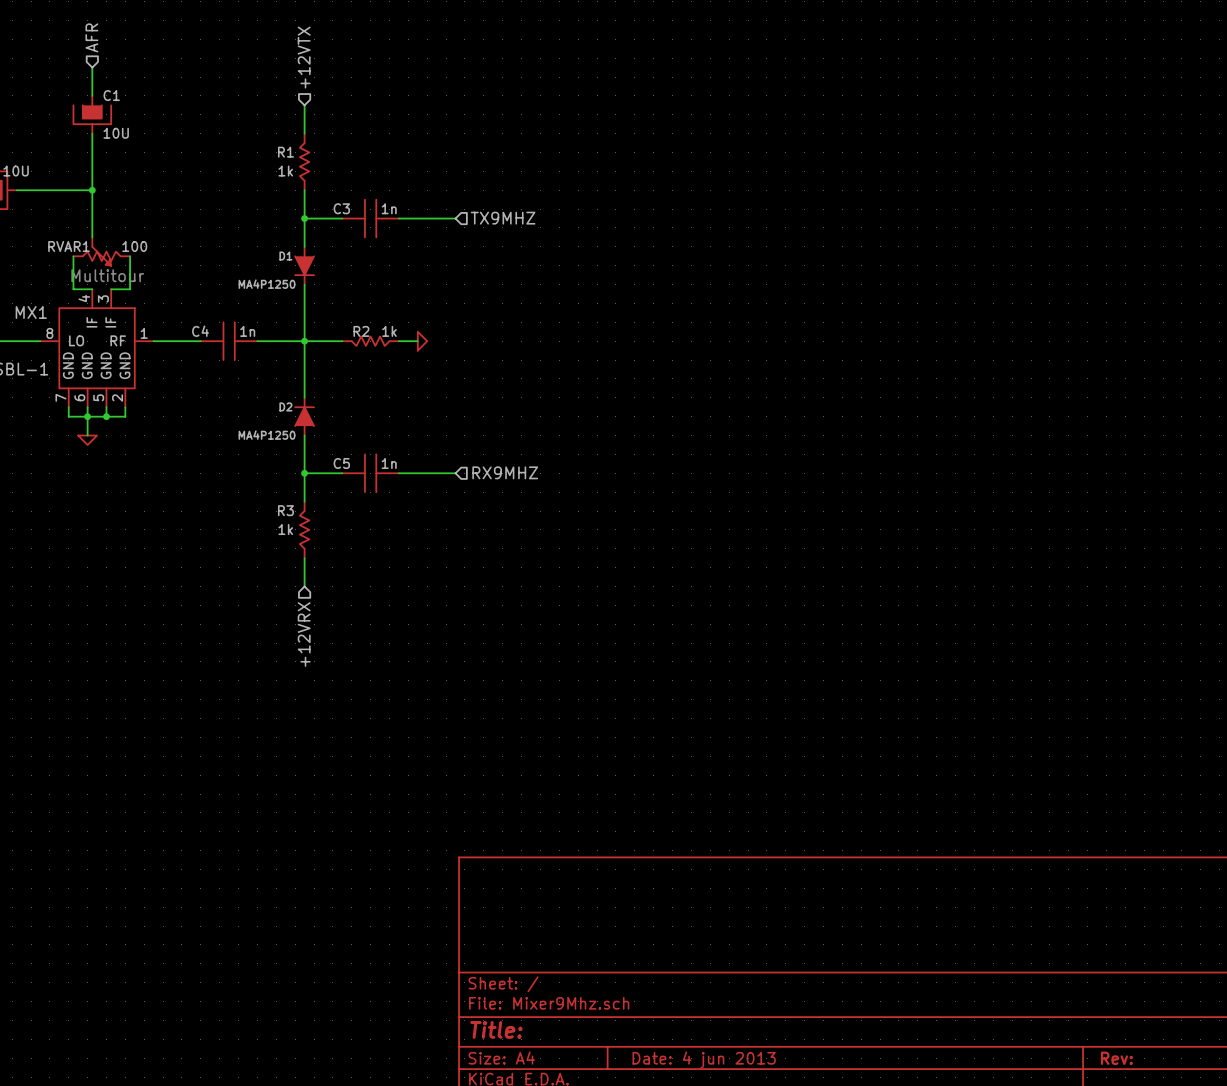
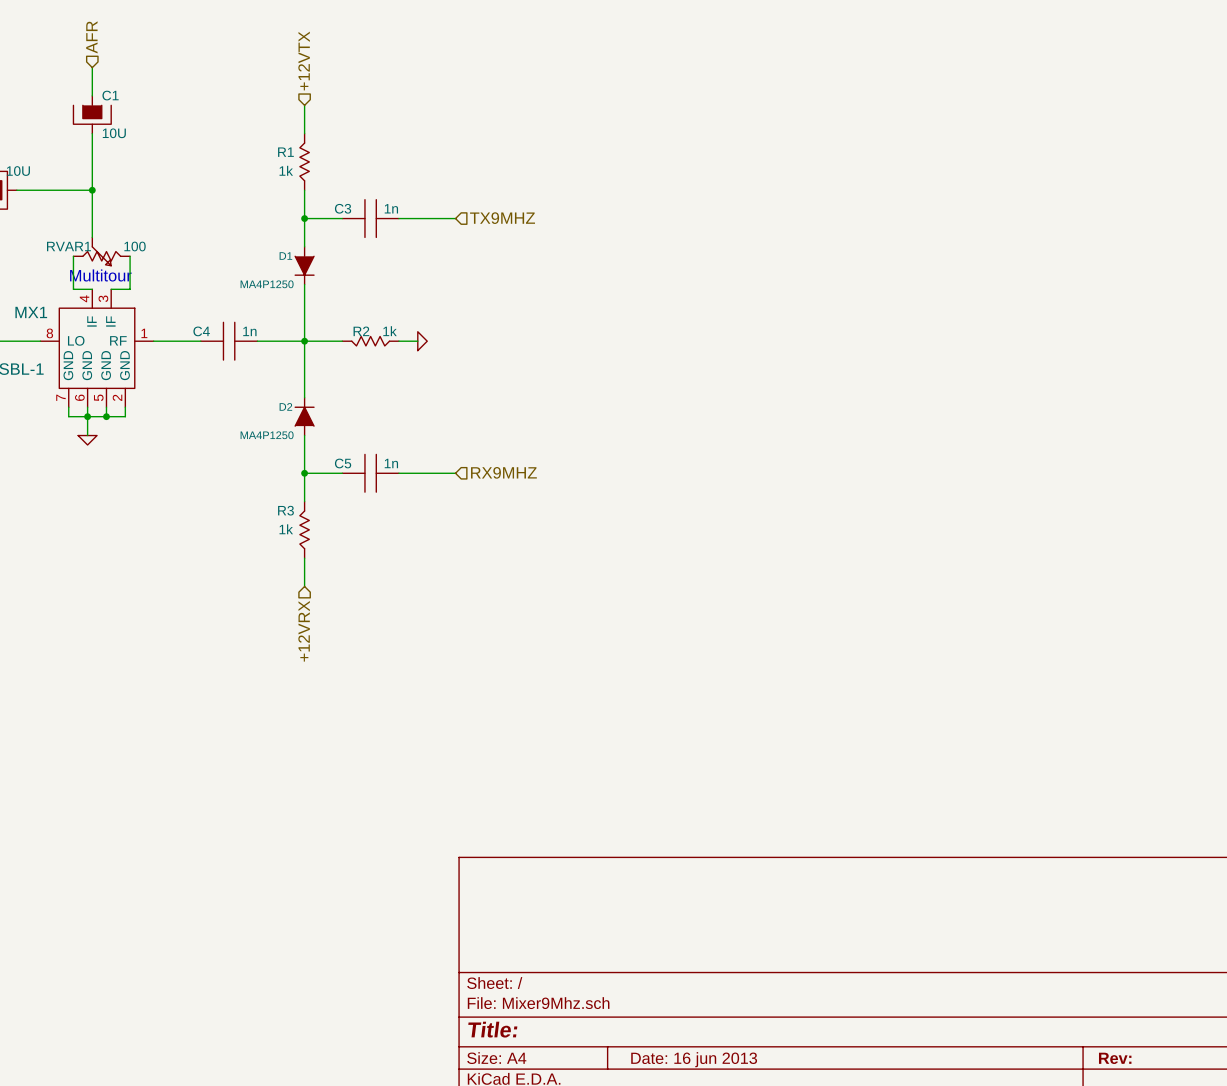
title block: Date: 4 jun 2013 (704, 1059) -> Date: 16 jun 2013 (694, 1059)

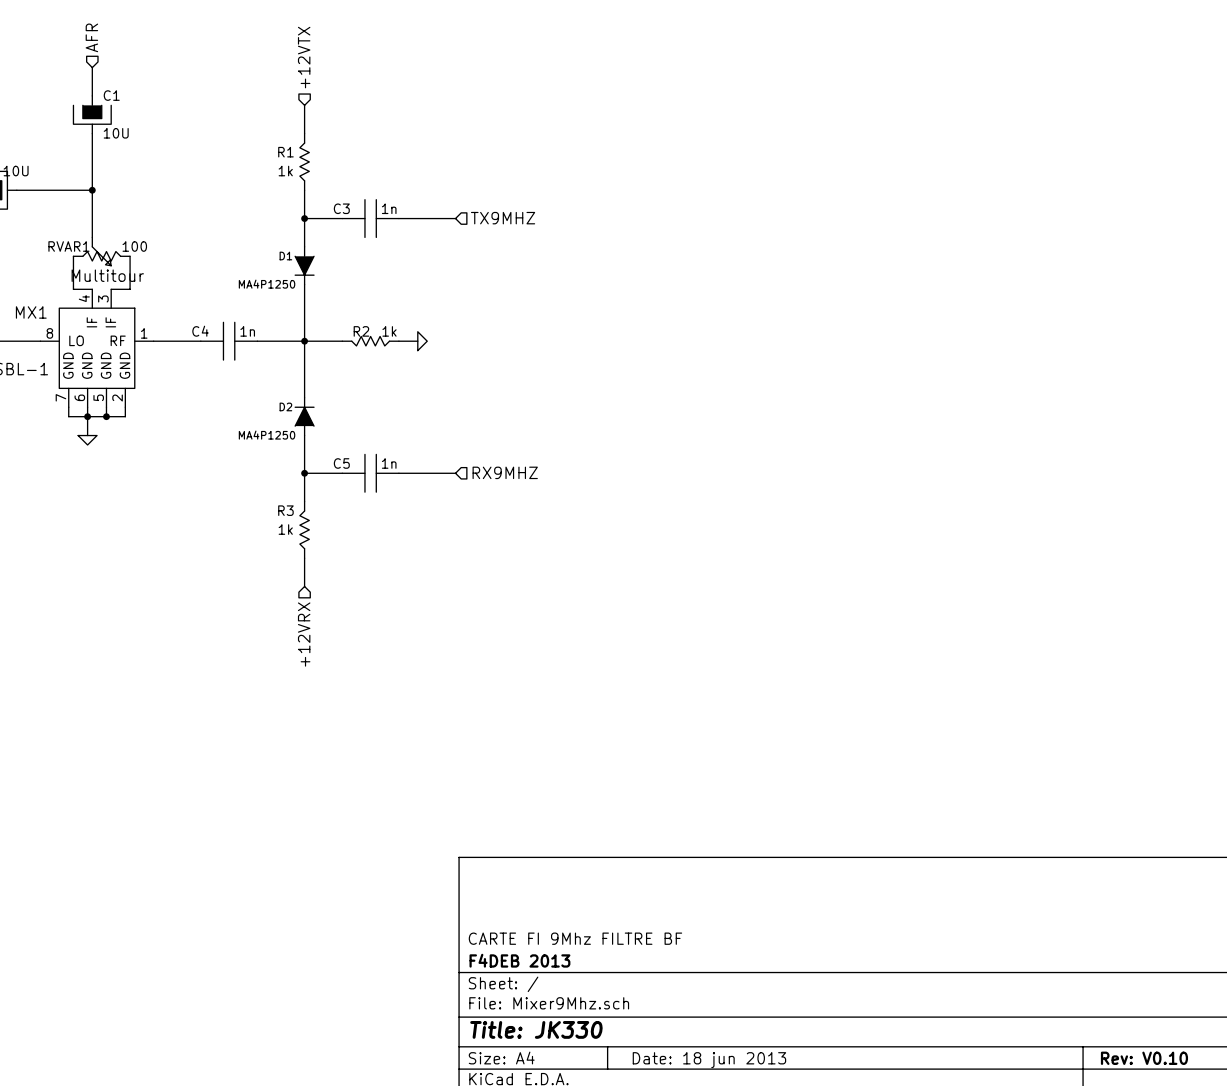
title block: none -> CARTE FI 9Mhz FILTRE BF (575, 938)
title block: none -> F4DEB 2013 (519, 960)
title block: Title: (492, 1029) -> Title: JK330 (536, 1029)
title block: Rev: (1115, 1058) -> Rev: V0.10 (1144, 1058)
title block: Date: 16 jun 2013 (694, 1059) -> Date: 18 jun 2013 (709, 1060)

